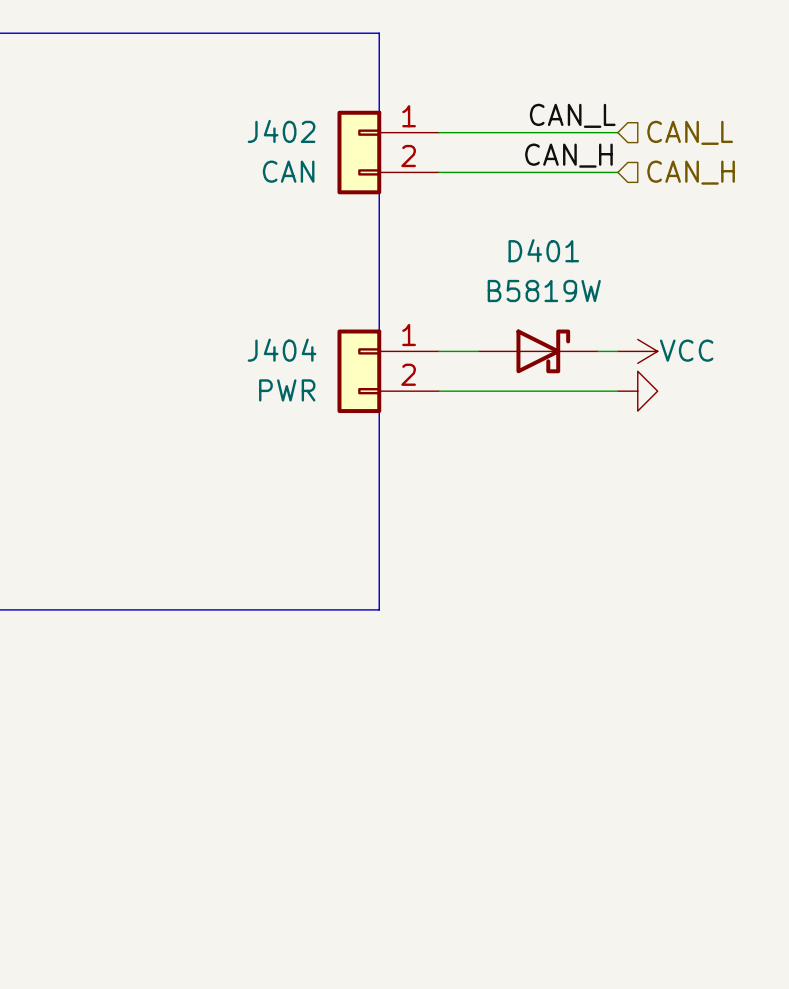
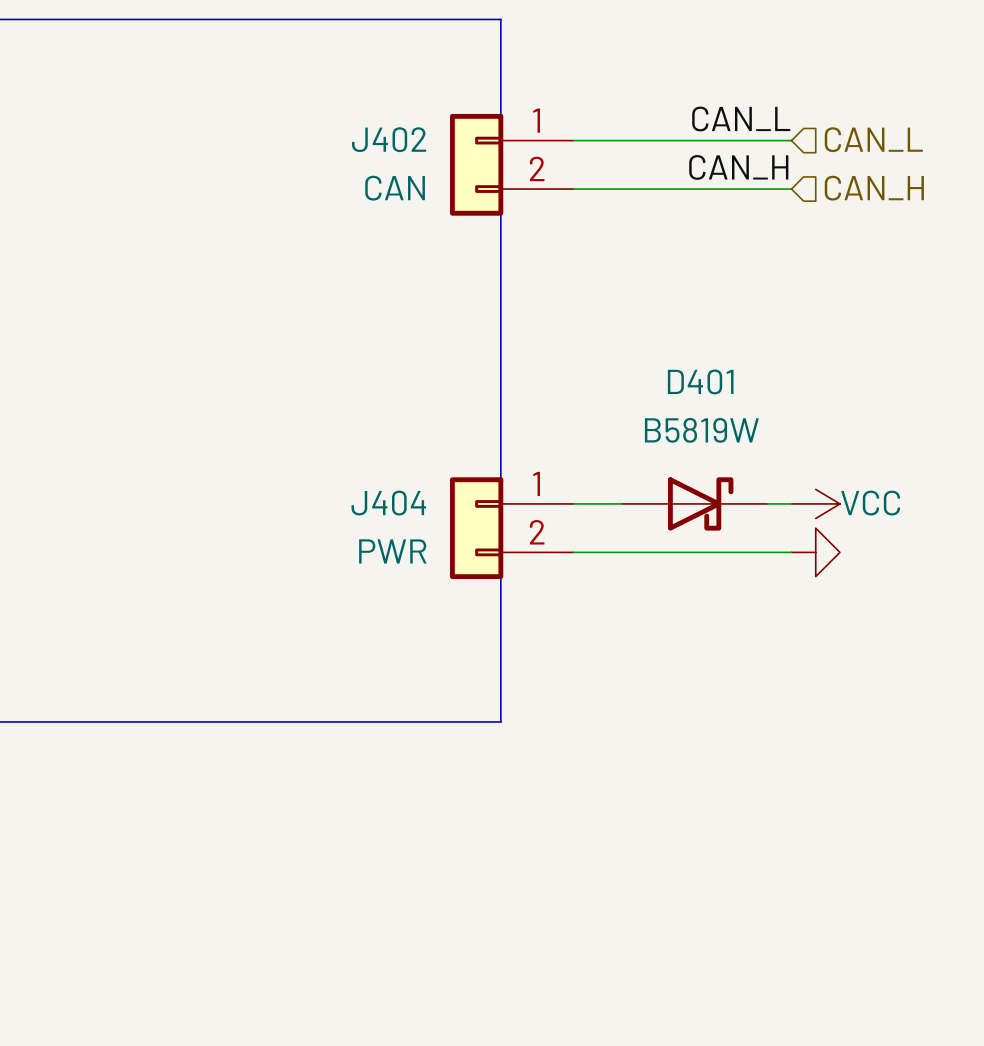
wire: (438, 351) (478, 351) -> (573, 503) (621, 503)
D401 position: (538, 351) -> (694, 503)
wire: (597, 351) (617, 351) -> (767, 503) (791, 503)
power symbol position: VCC (637, 351) -> VCC (815, 503)
J404 position: (388, 371) -> (511, 528)
wire: (438, 391) (617, 391) -> (573, 552) (791, 552)
power symbol position: (637, 391) -> (815, 552)

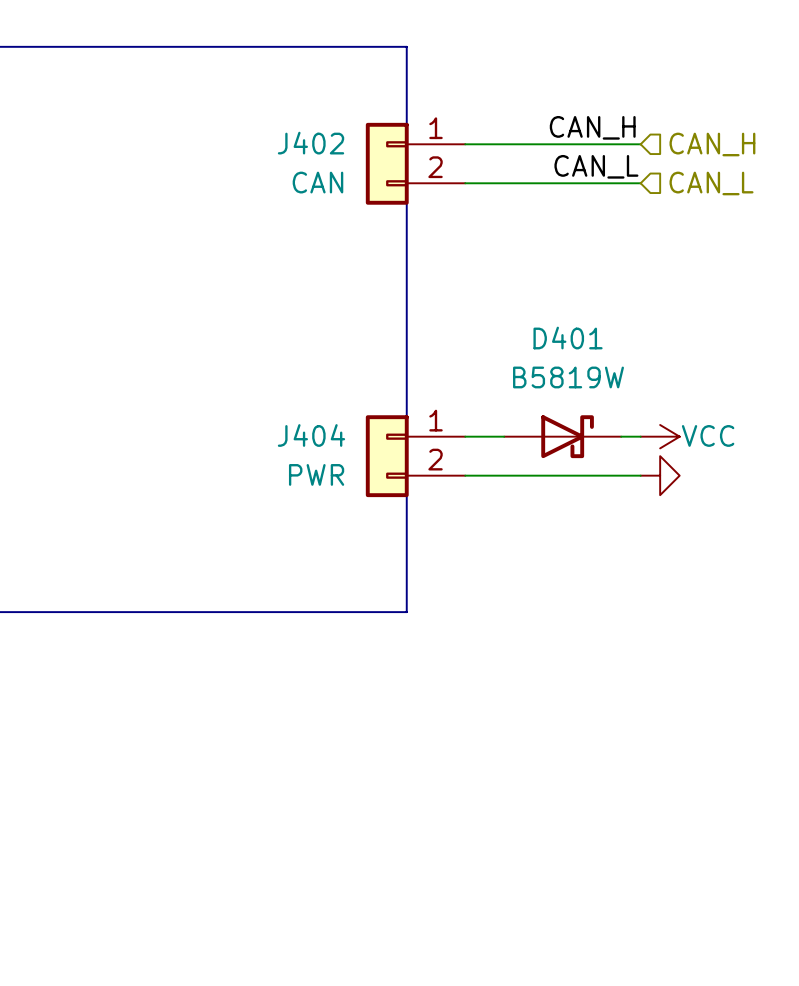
label: CAN_L (741, 119) -> CAN_H (592, 127)
hierarchical label: CAN_L (873, 139) -> CAN_H (712, 144)
label: CAN_H (738, 167) -> CAN_L (596, 166)
hierarchical label: CAN_H (874, 188) -> CAN_L (711, 183)

